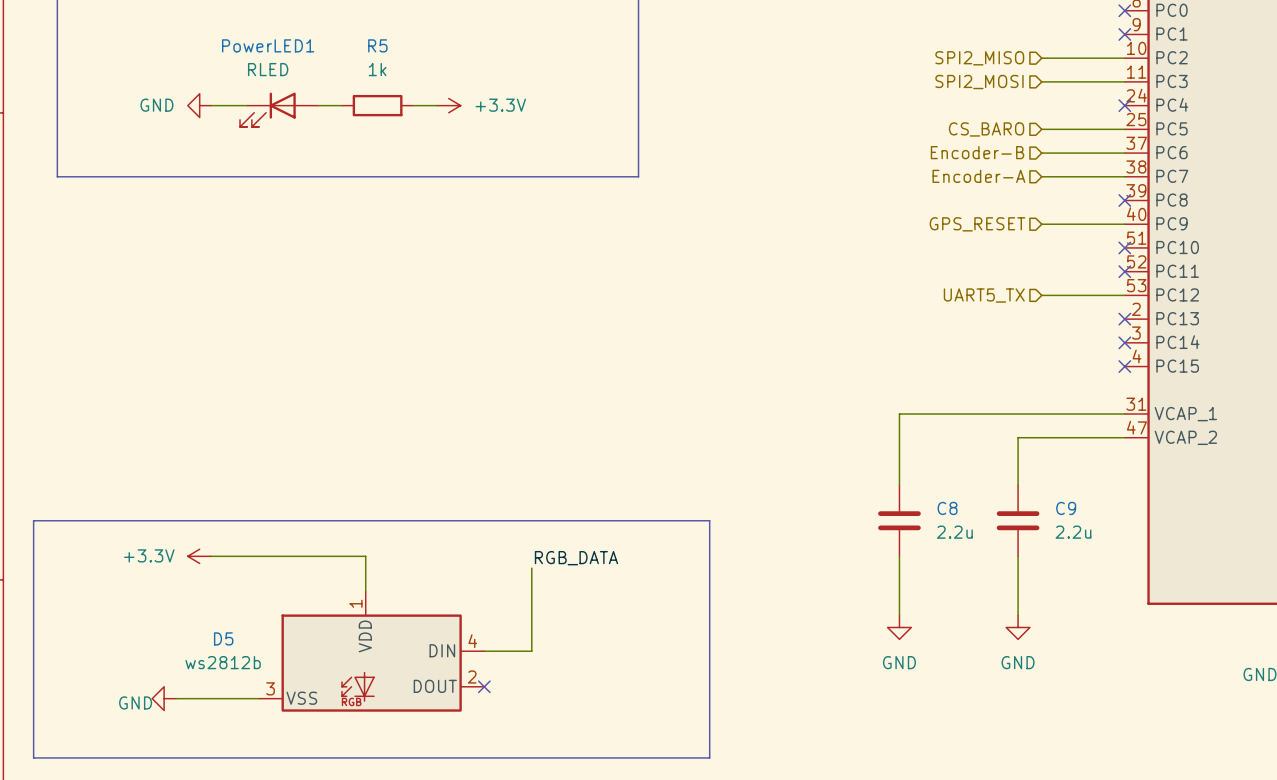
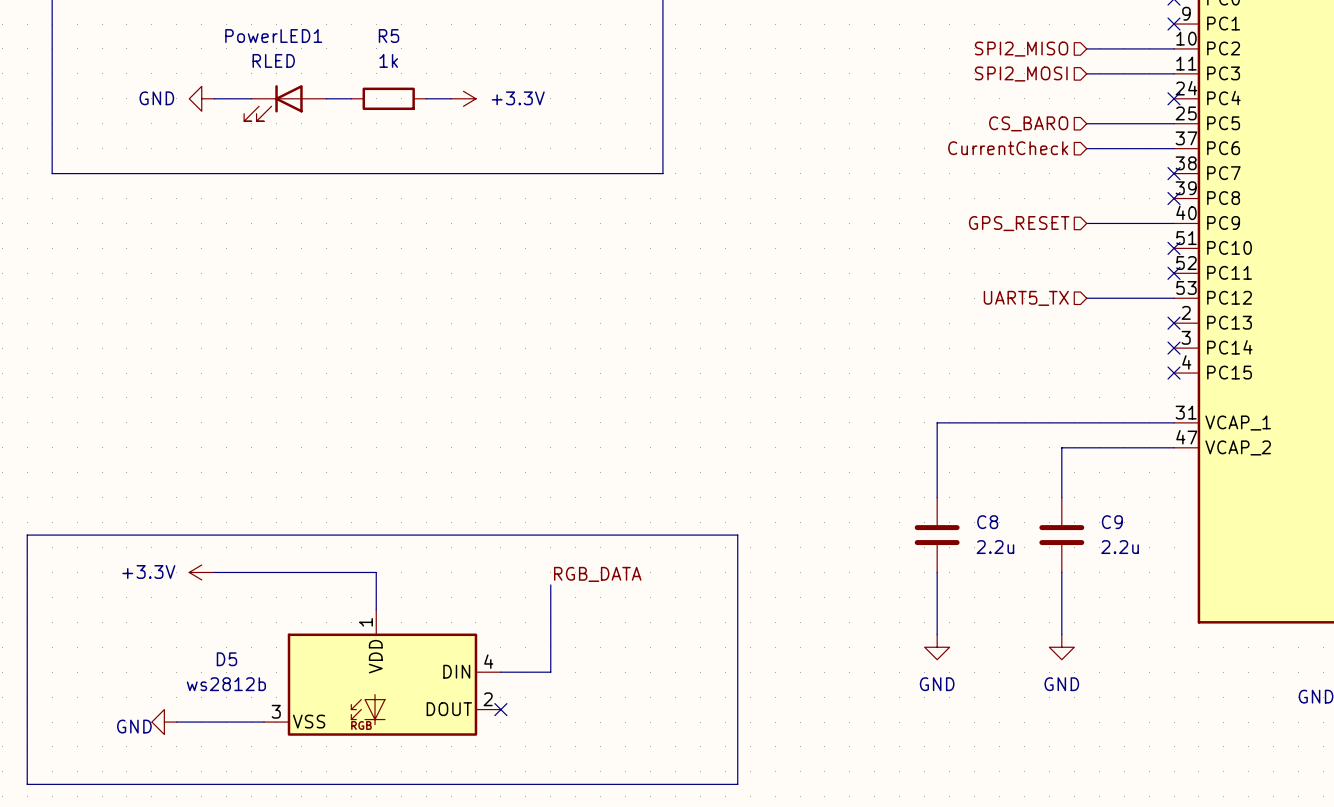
hierarchical label: Encoder-B (977, 152) -> CurrentCheck (1008, 148)
hierarchical label: Encoder-A (978, 176) -> none
wire: (1041, 176) (1124, 176) -> none
no-connect mark: none -> (1174, 173)

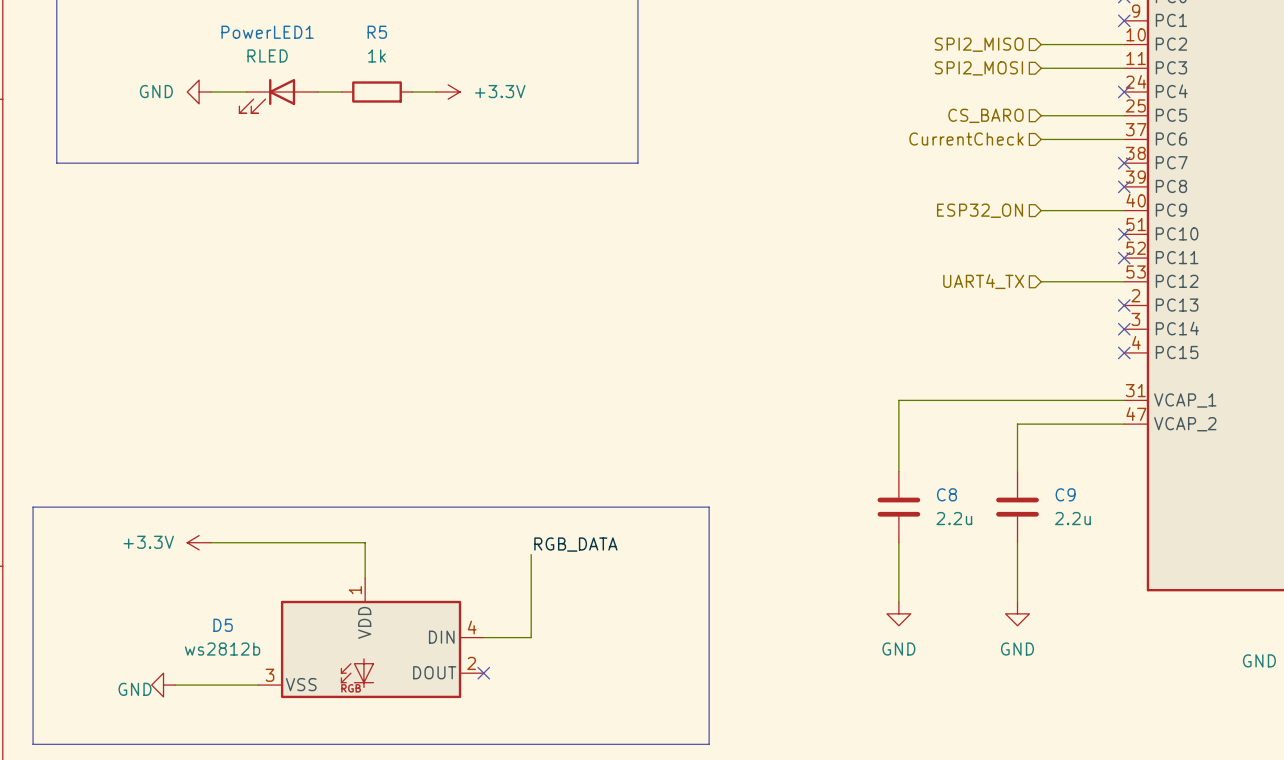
hierarchical label: GPS_RESET (1019, 223) -> ESP32_ON (980, 210)
hierarchical label: UART5_TX (1026, 298) -> UART4_TX (983, 281)

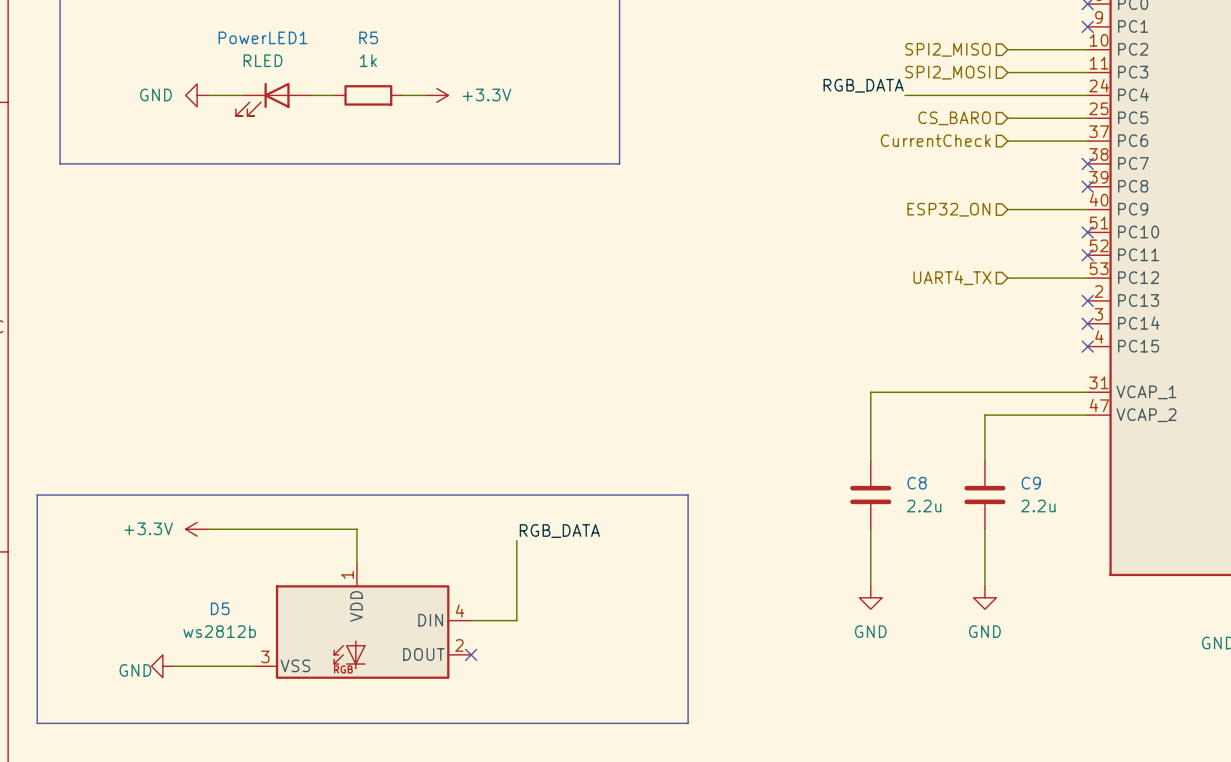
label: none -> RGB_DATA (863, 85)
wire: none -> (905, 95) (1087, 95)
no-connect mark: (1124, 92) -> none

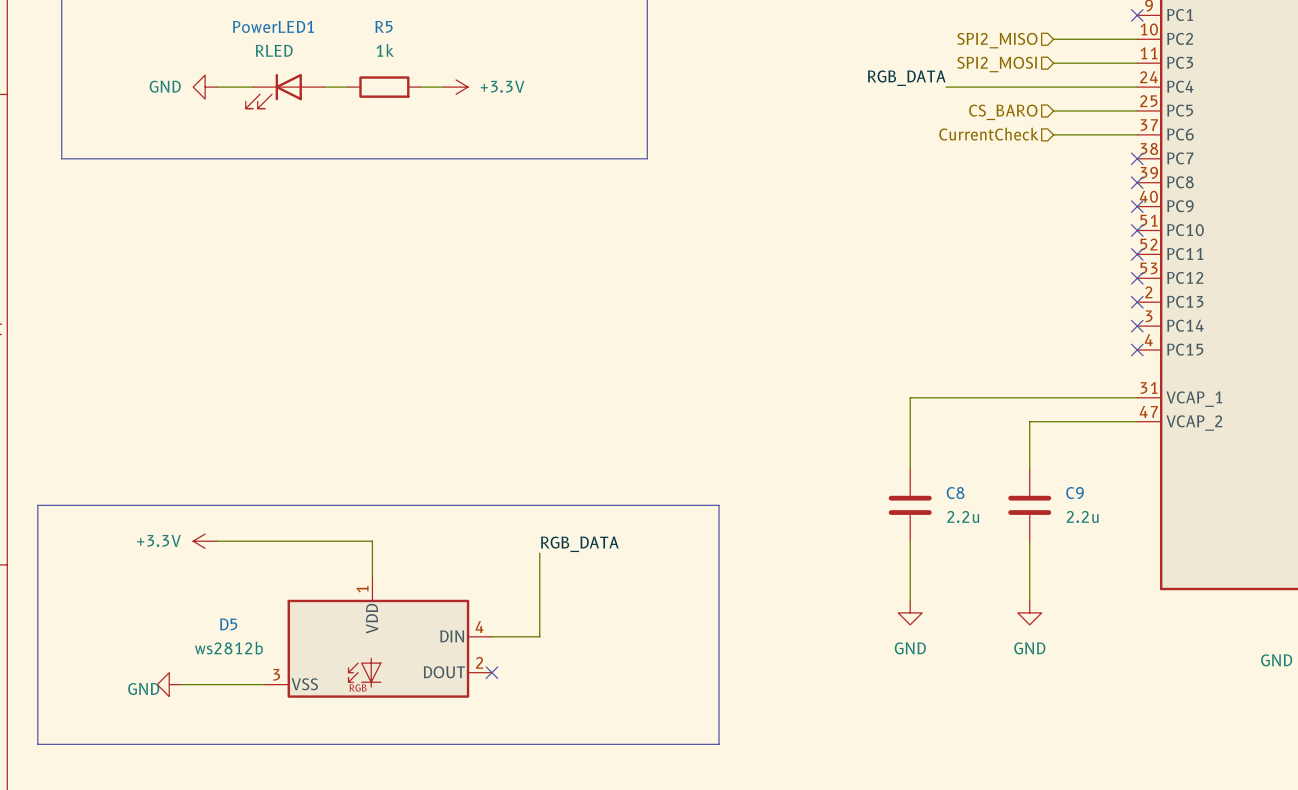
hierarchical label: ESP32_ON (948, 209) -> none
wire: (1007, 209) (1087, 209) -> none
no-connect mark: none -> (1137, 206)
hierarchical label: UART4_TX (952, 277) -> none
wire: (1007, 278) (1087, 278) -> none
no-connect mark: none -> (1137, 278)

